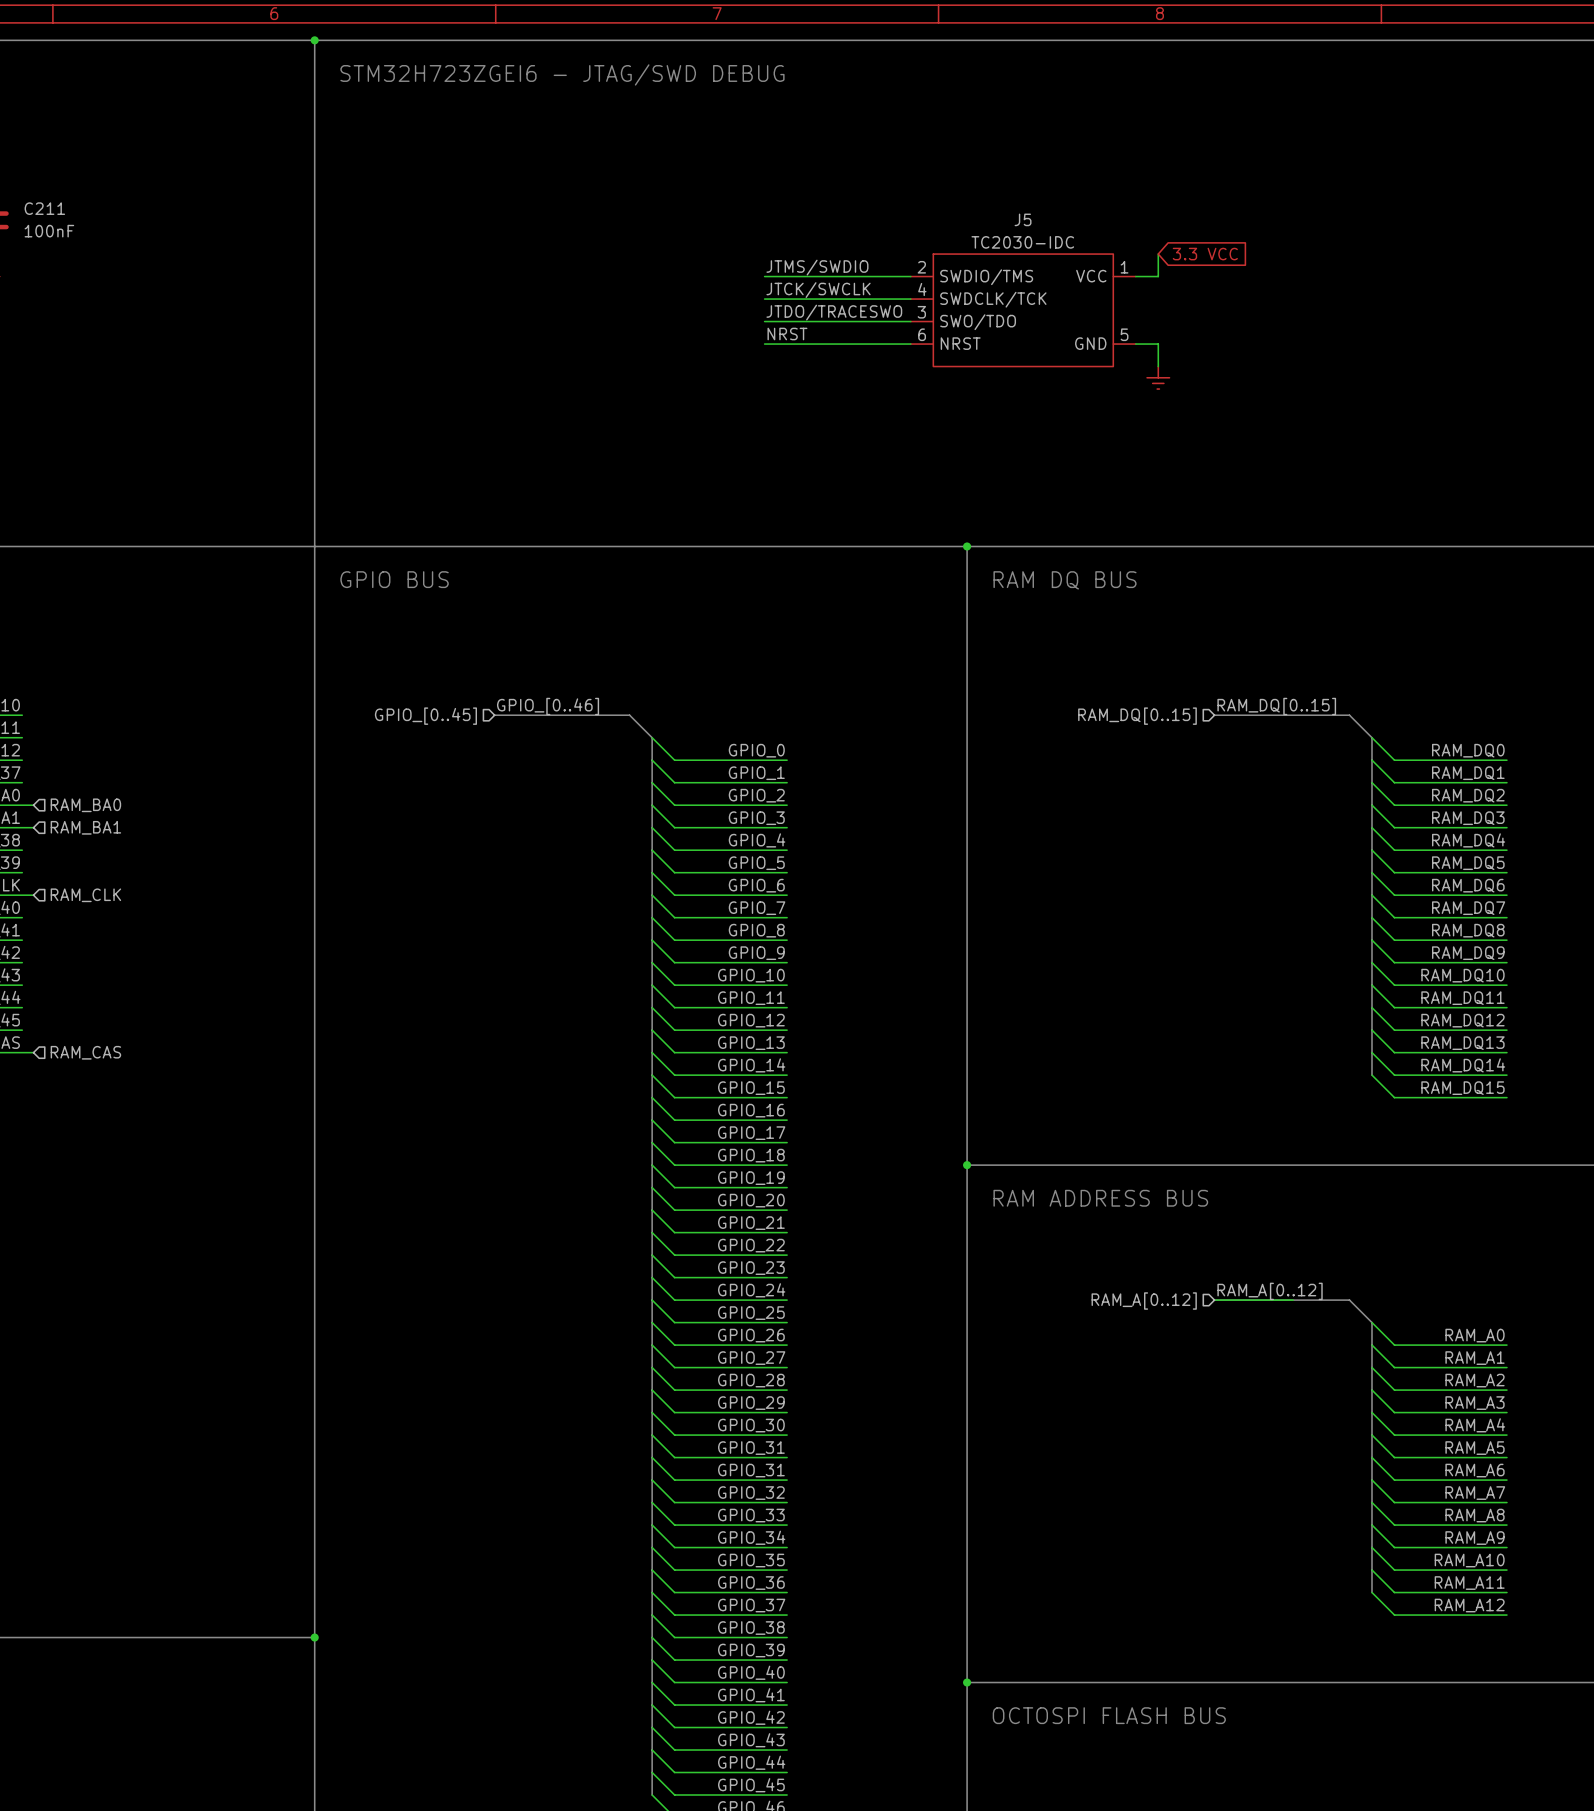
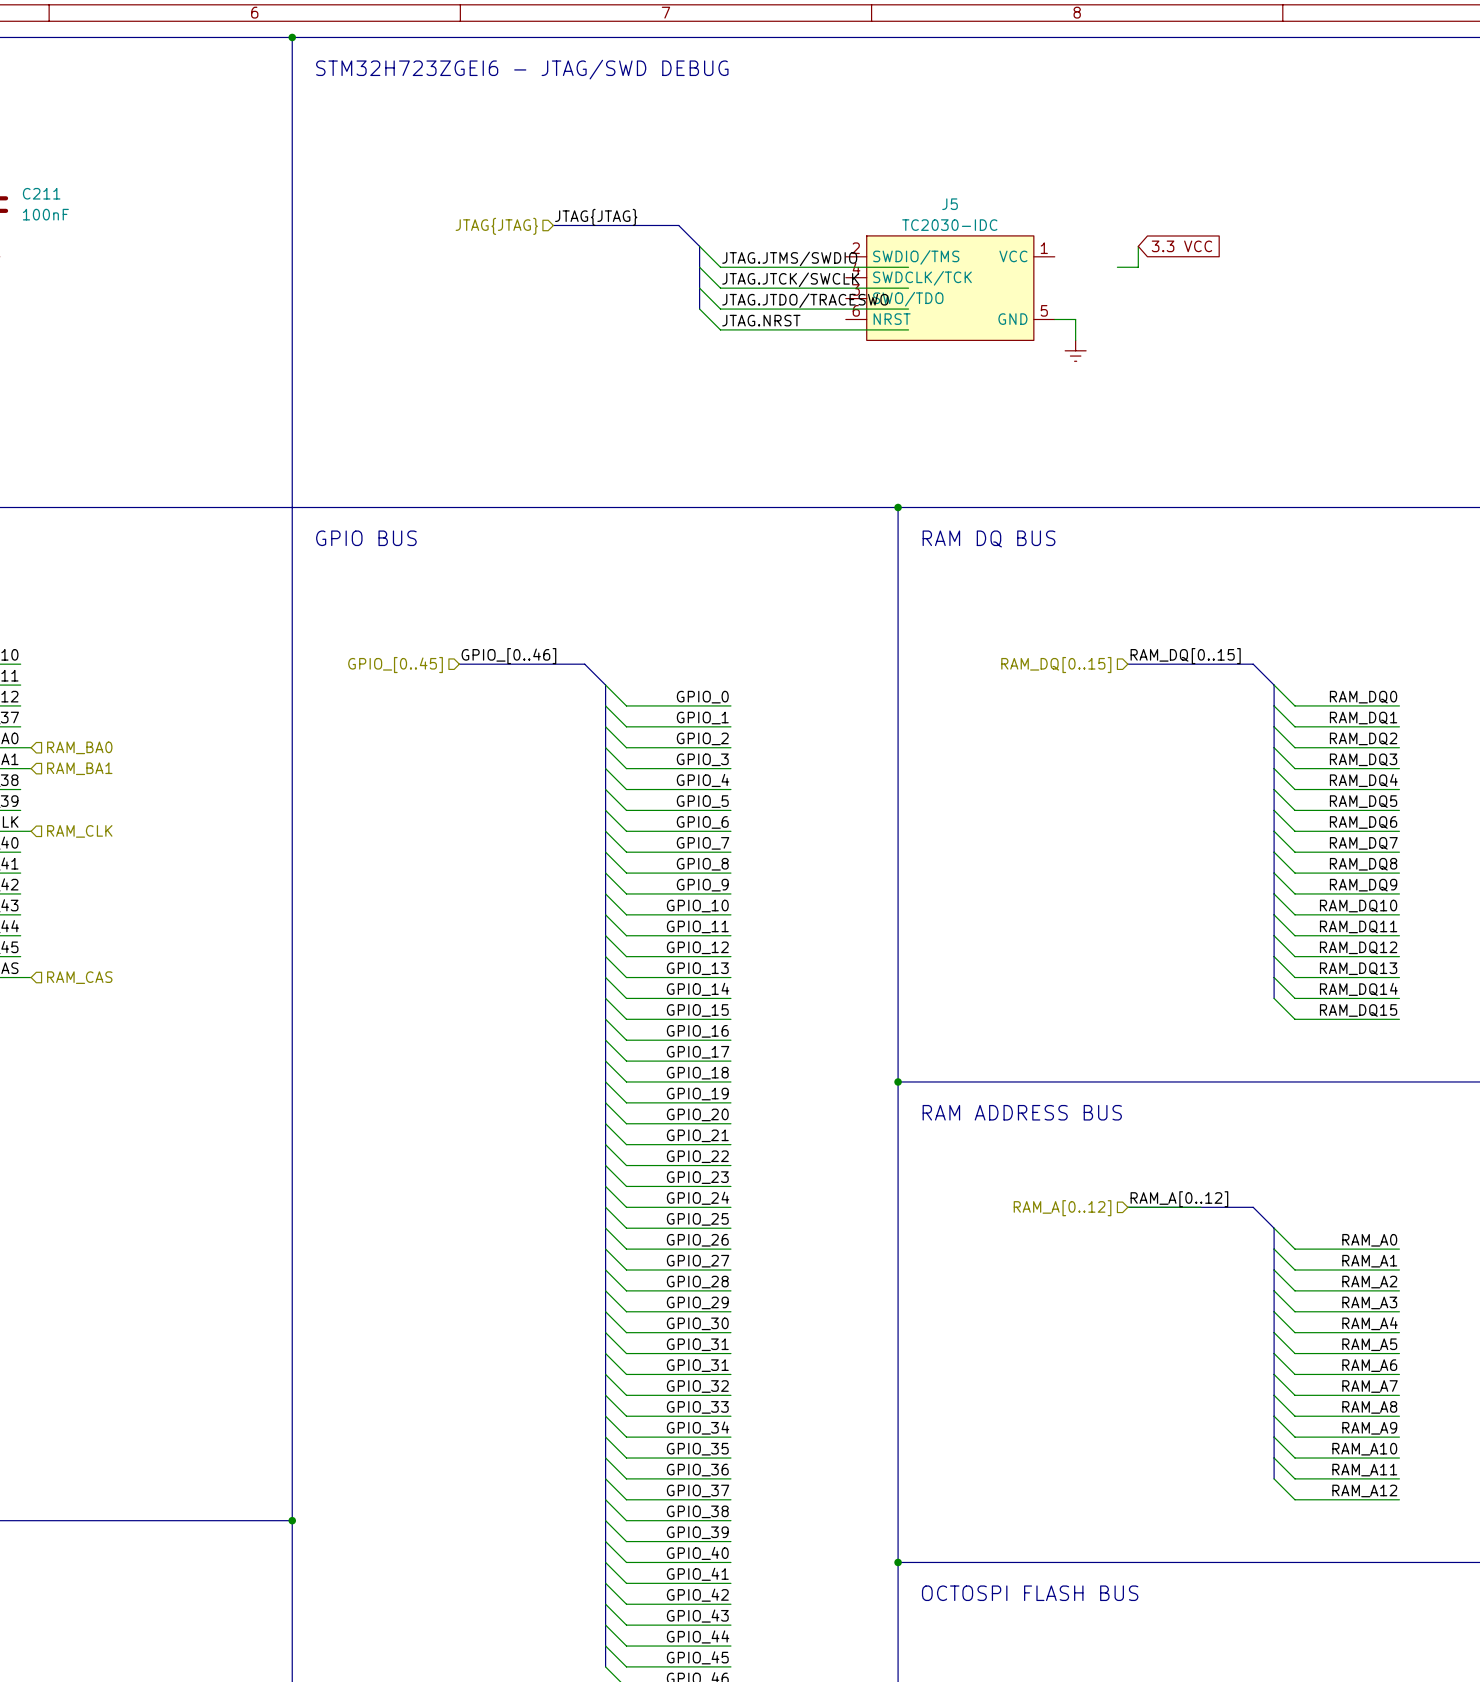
label: none -> JTAG{JTAG} (596, 217)
bus: none -> (553, 225) (678, 225) (699, 246) (699, 309)
hierarchical label: none -> JTAG{JTAG} (496, 226)
wire: (1158, 254) (1158, 276) (1135, 276) -> (1138, 246) (1138, 267) (1117, 267)
global label position: 3.3 VCC (1205, 254) -> 3.3 VCC (1181, 246)
wire: none -> (699, 246) (720, 267) (908, 267)
label: JTMS/SWDIO (817, 267) -> JTAG.JTMS/SWDIO (789, 258)
wire: (764, 276) (910, 276) -> none
wire: none -> (699, 267) (720, 288) (908, 288)
label: JTCK/SWCLK (818, 290) -> JTAG.JTCK/SWCLK (790, 279)
wire: (764, 299) (910, 299) -> none
wire: none -> (699, 288) (720, 309) (908, 309)
label: JTDO/TRACESWO (834, 312) -> JTAG.JTDO/TRACESWO (805, 300)
wire: (764, 321) (910, 321) -> none
wire: none -> (699, 309) (720, 329) (908, 329)
label: NRST (787, 334) -> JTAG.NRST (761, 320)
wire: (764, 344) (910, 344) -> none

